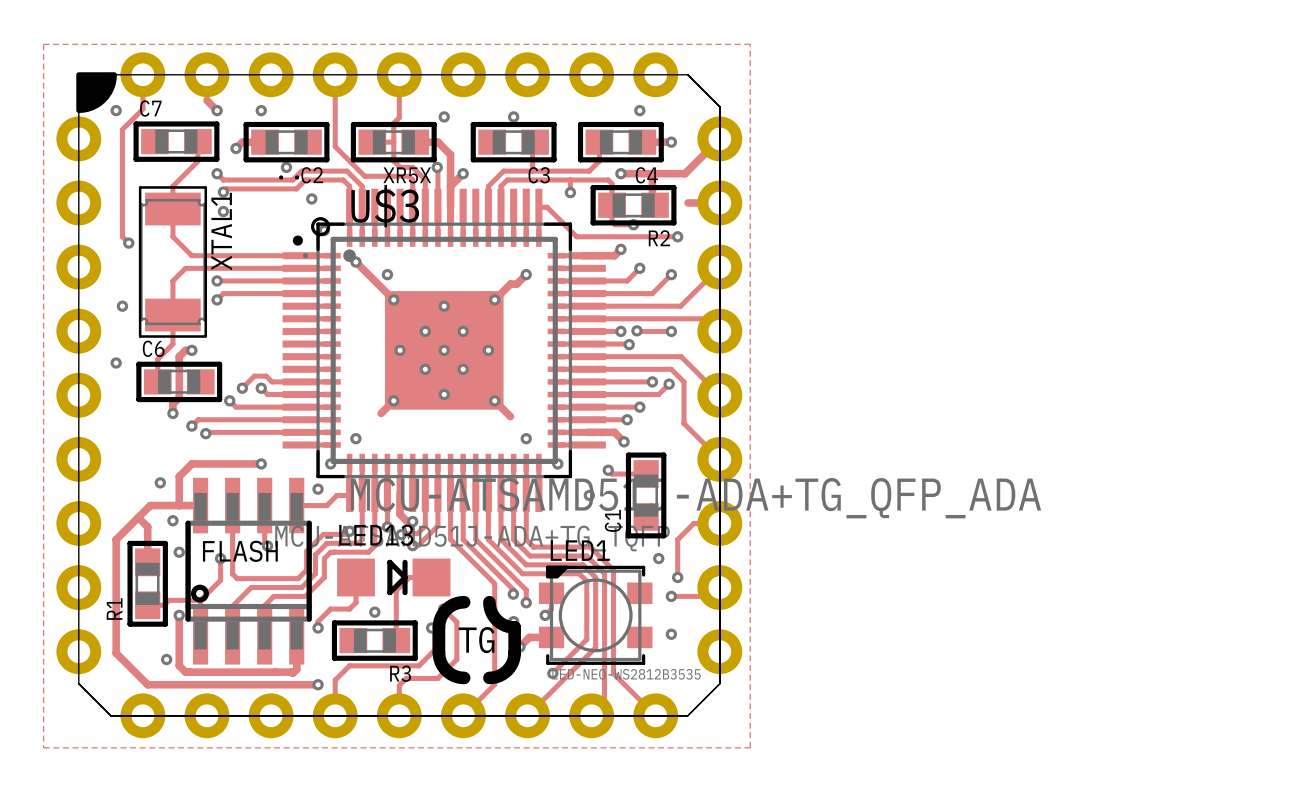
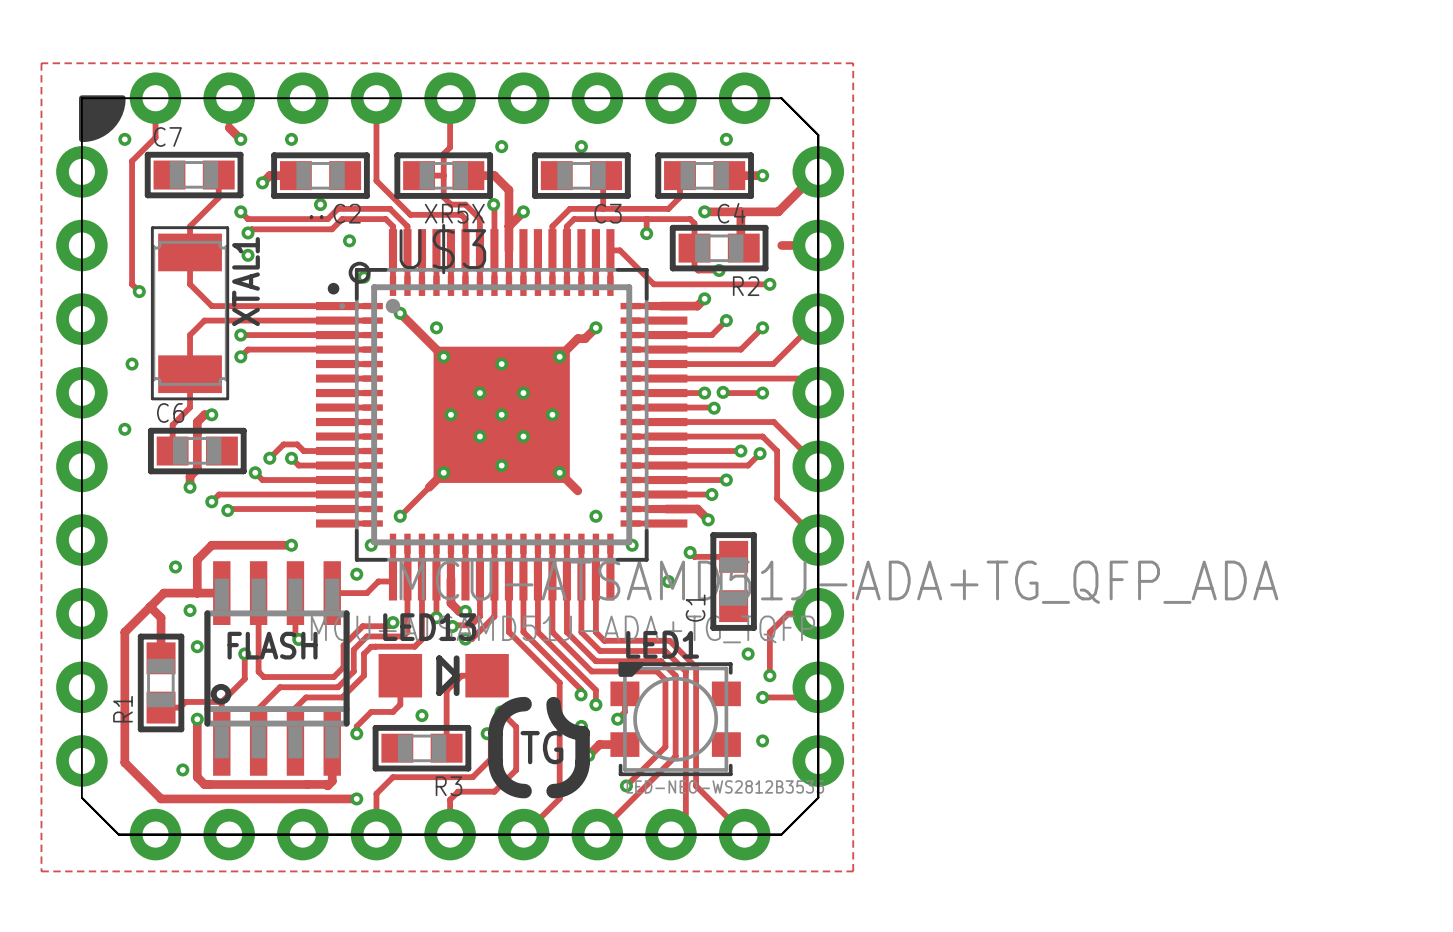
track: none -> (429, 487) (400, 516)

